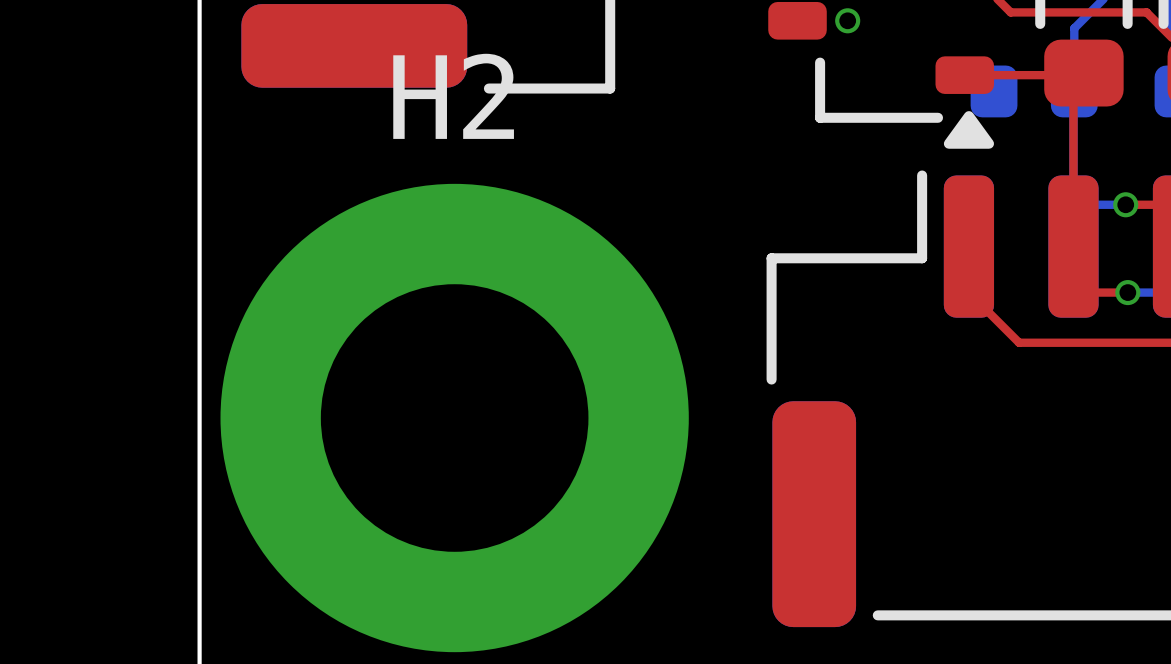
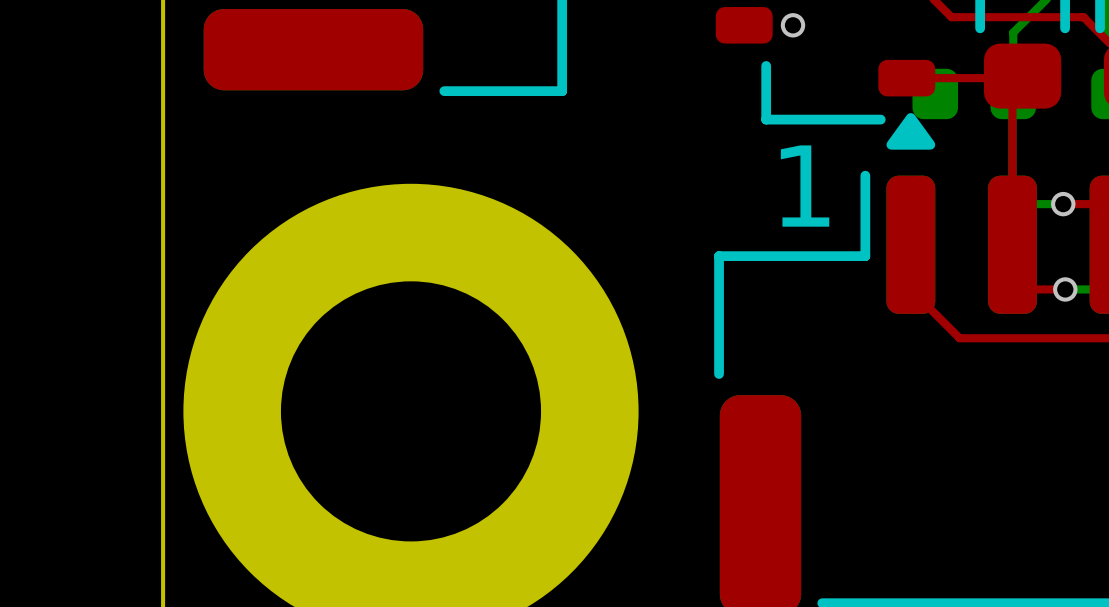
H2 name: H2 (453, 96) -> none
text: none -> 1 (805, 186)

